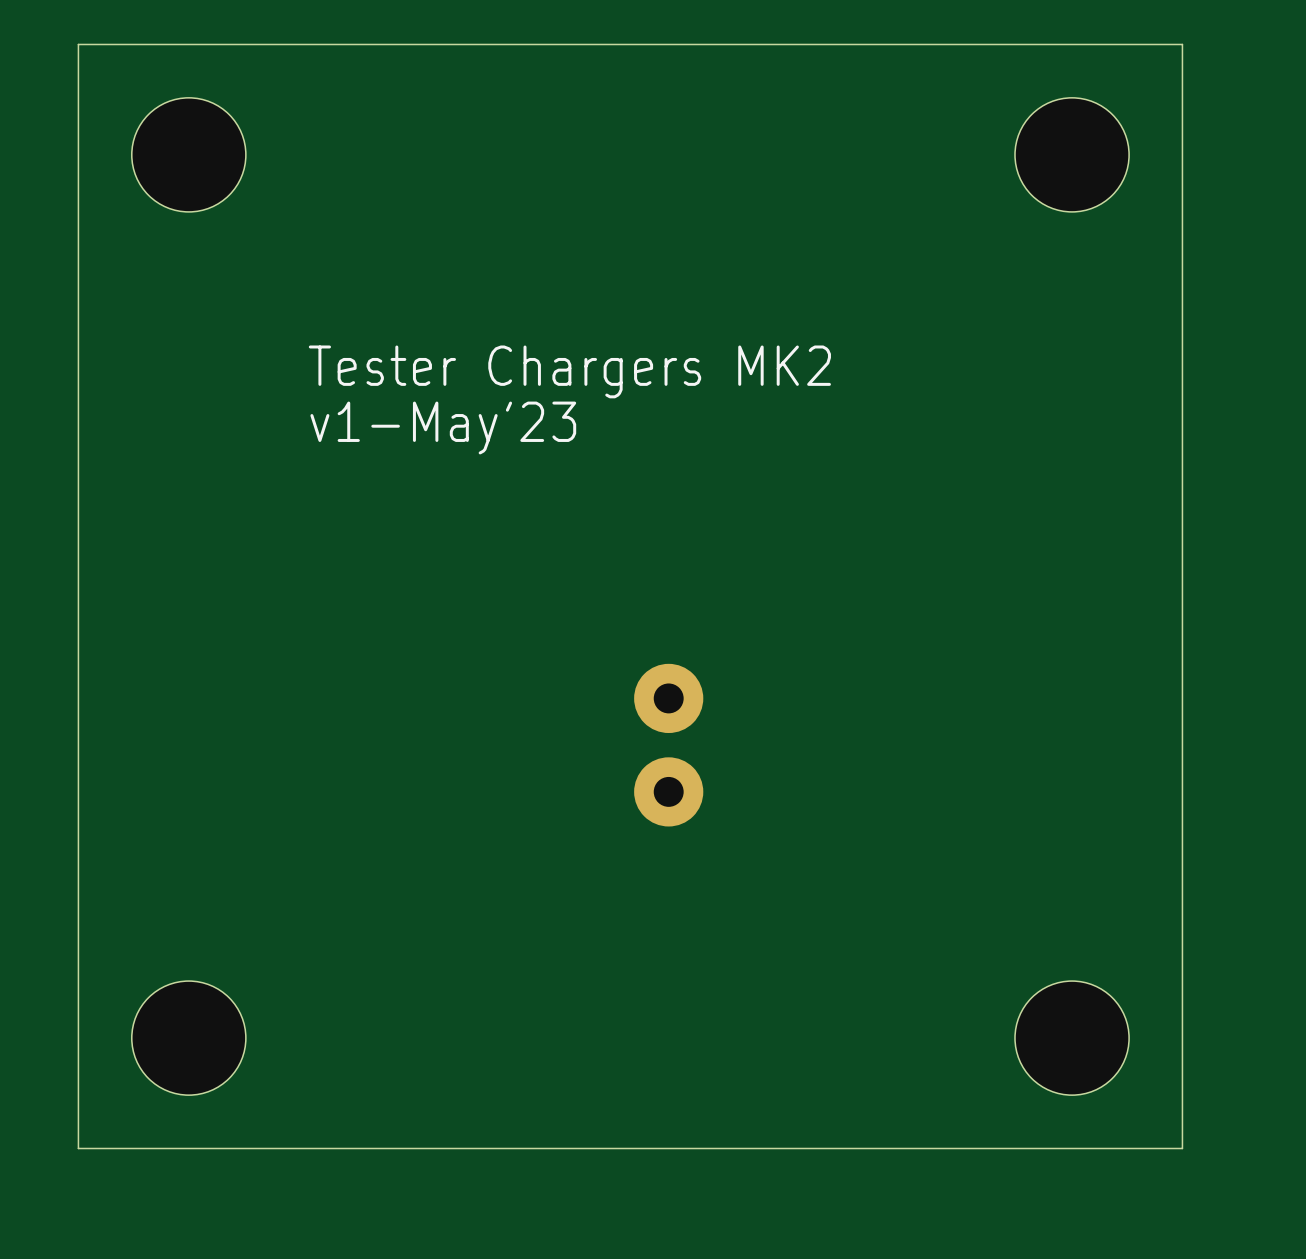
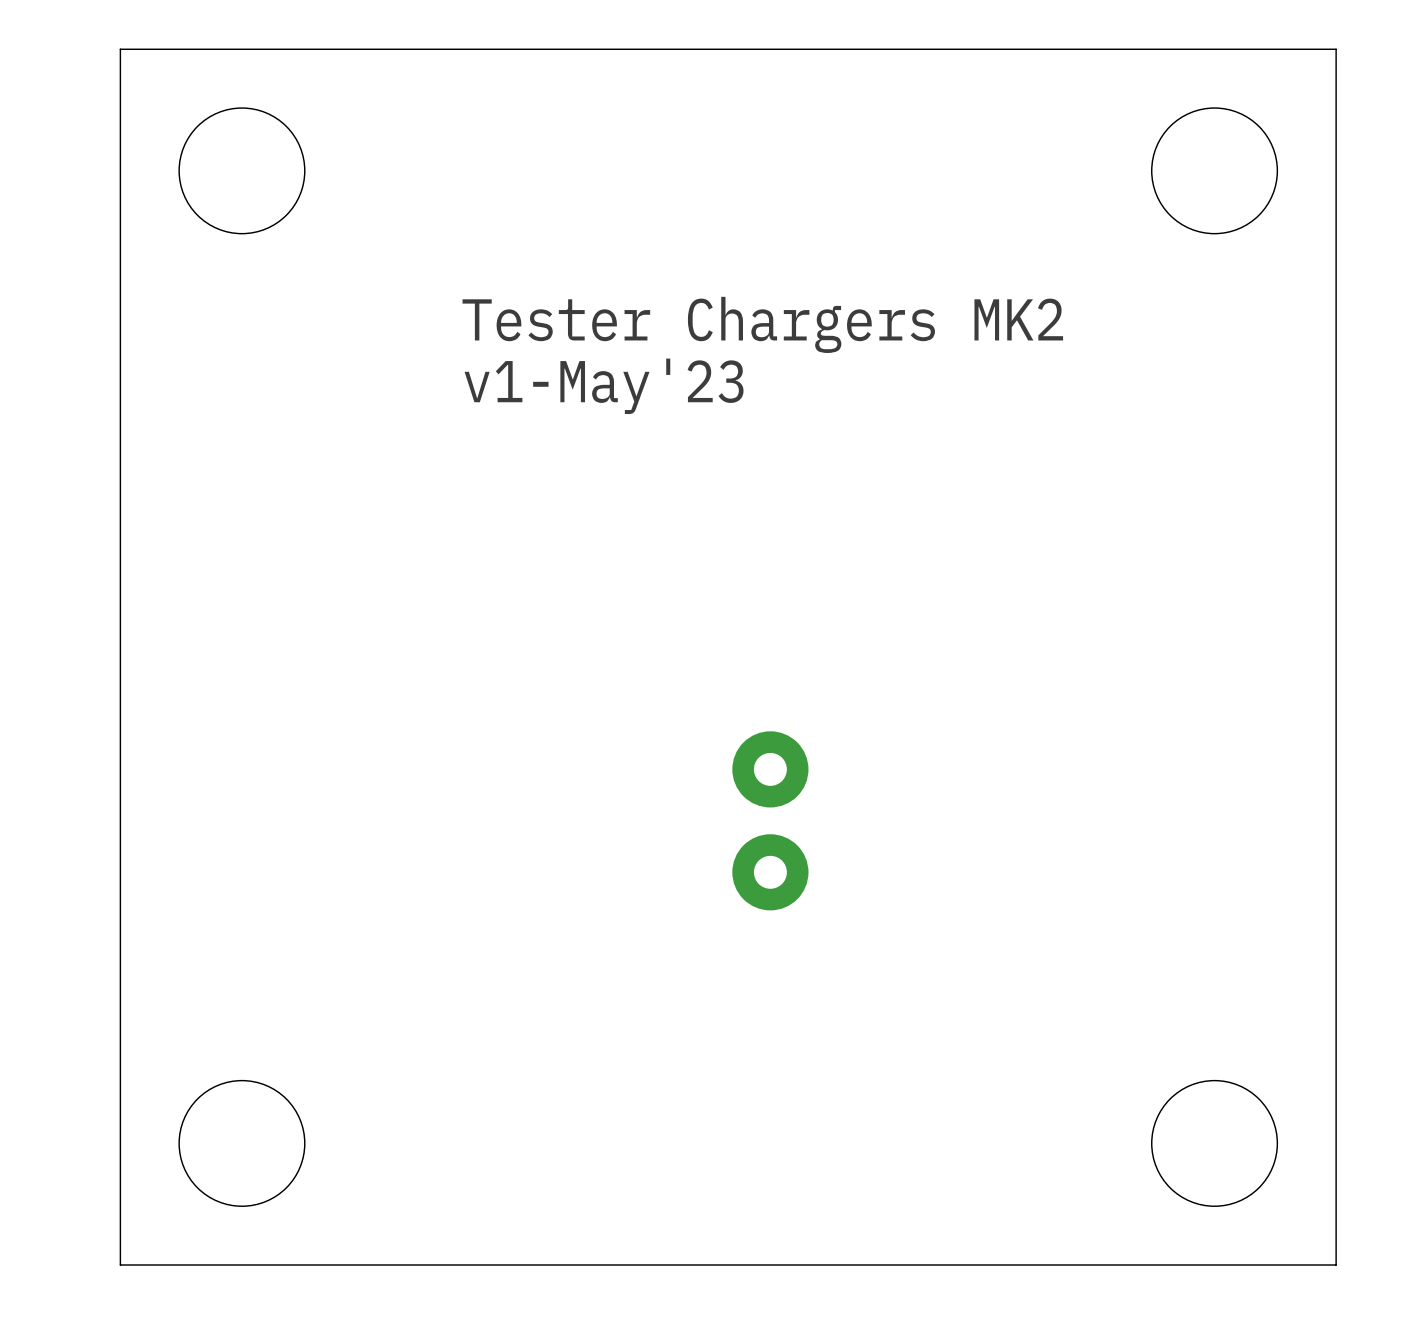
text position: Tester Chargers MK2 (569, 371) -> Tester Chargers MK2 (762, 324)
text position: v1-May'23 (443, 427) -> v1-May'23 (604, 386)

